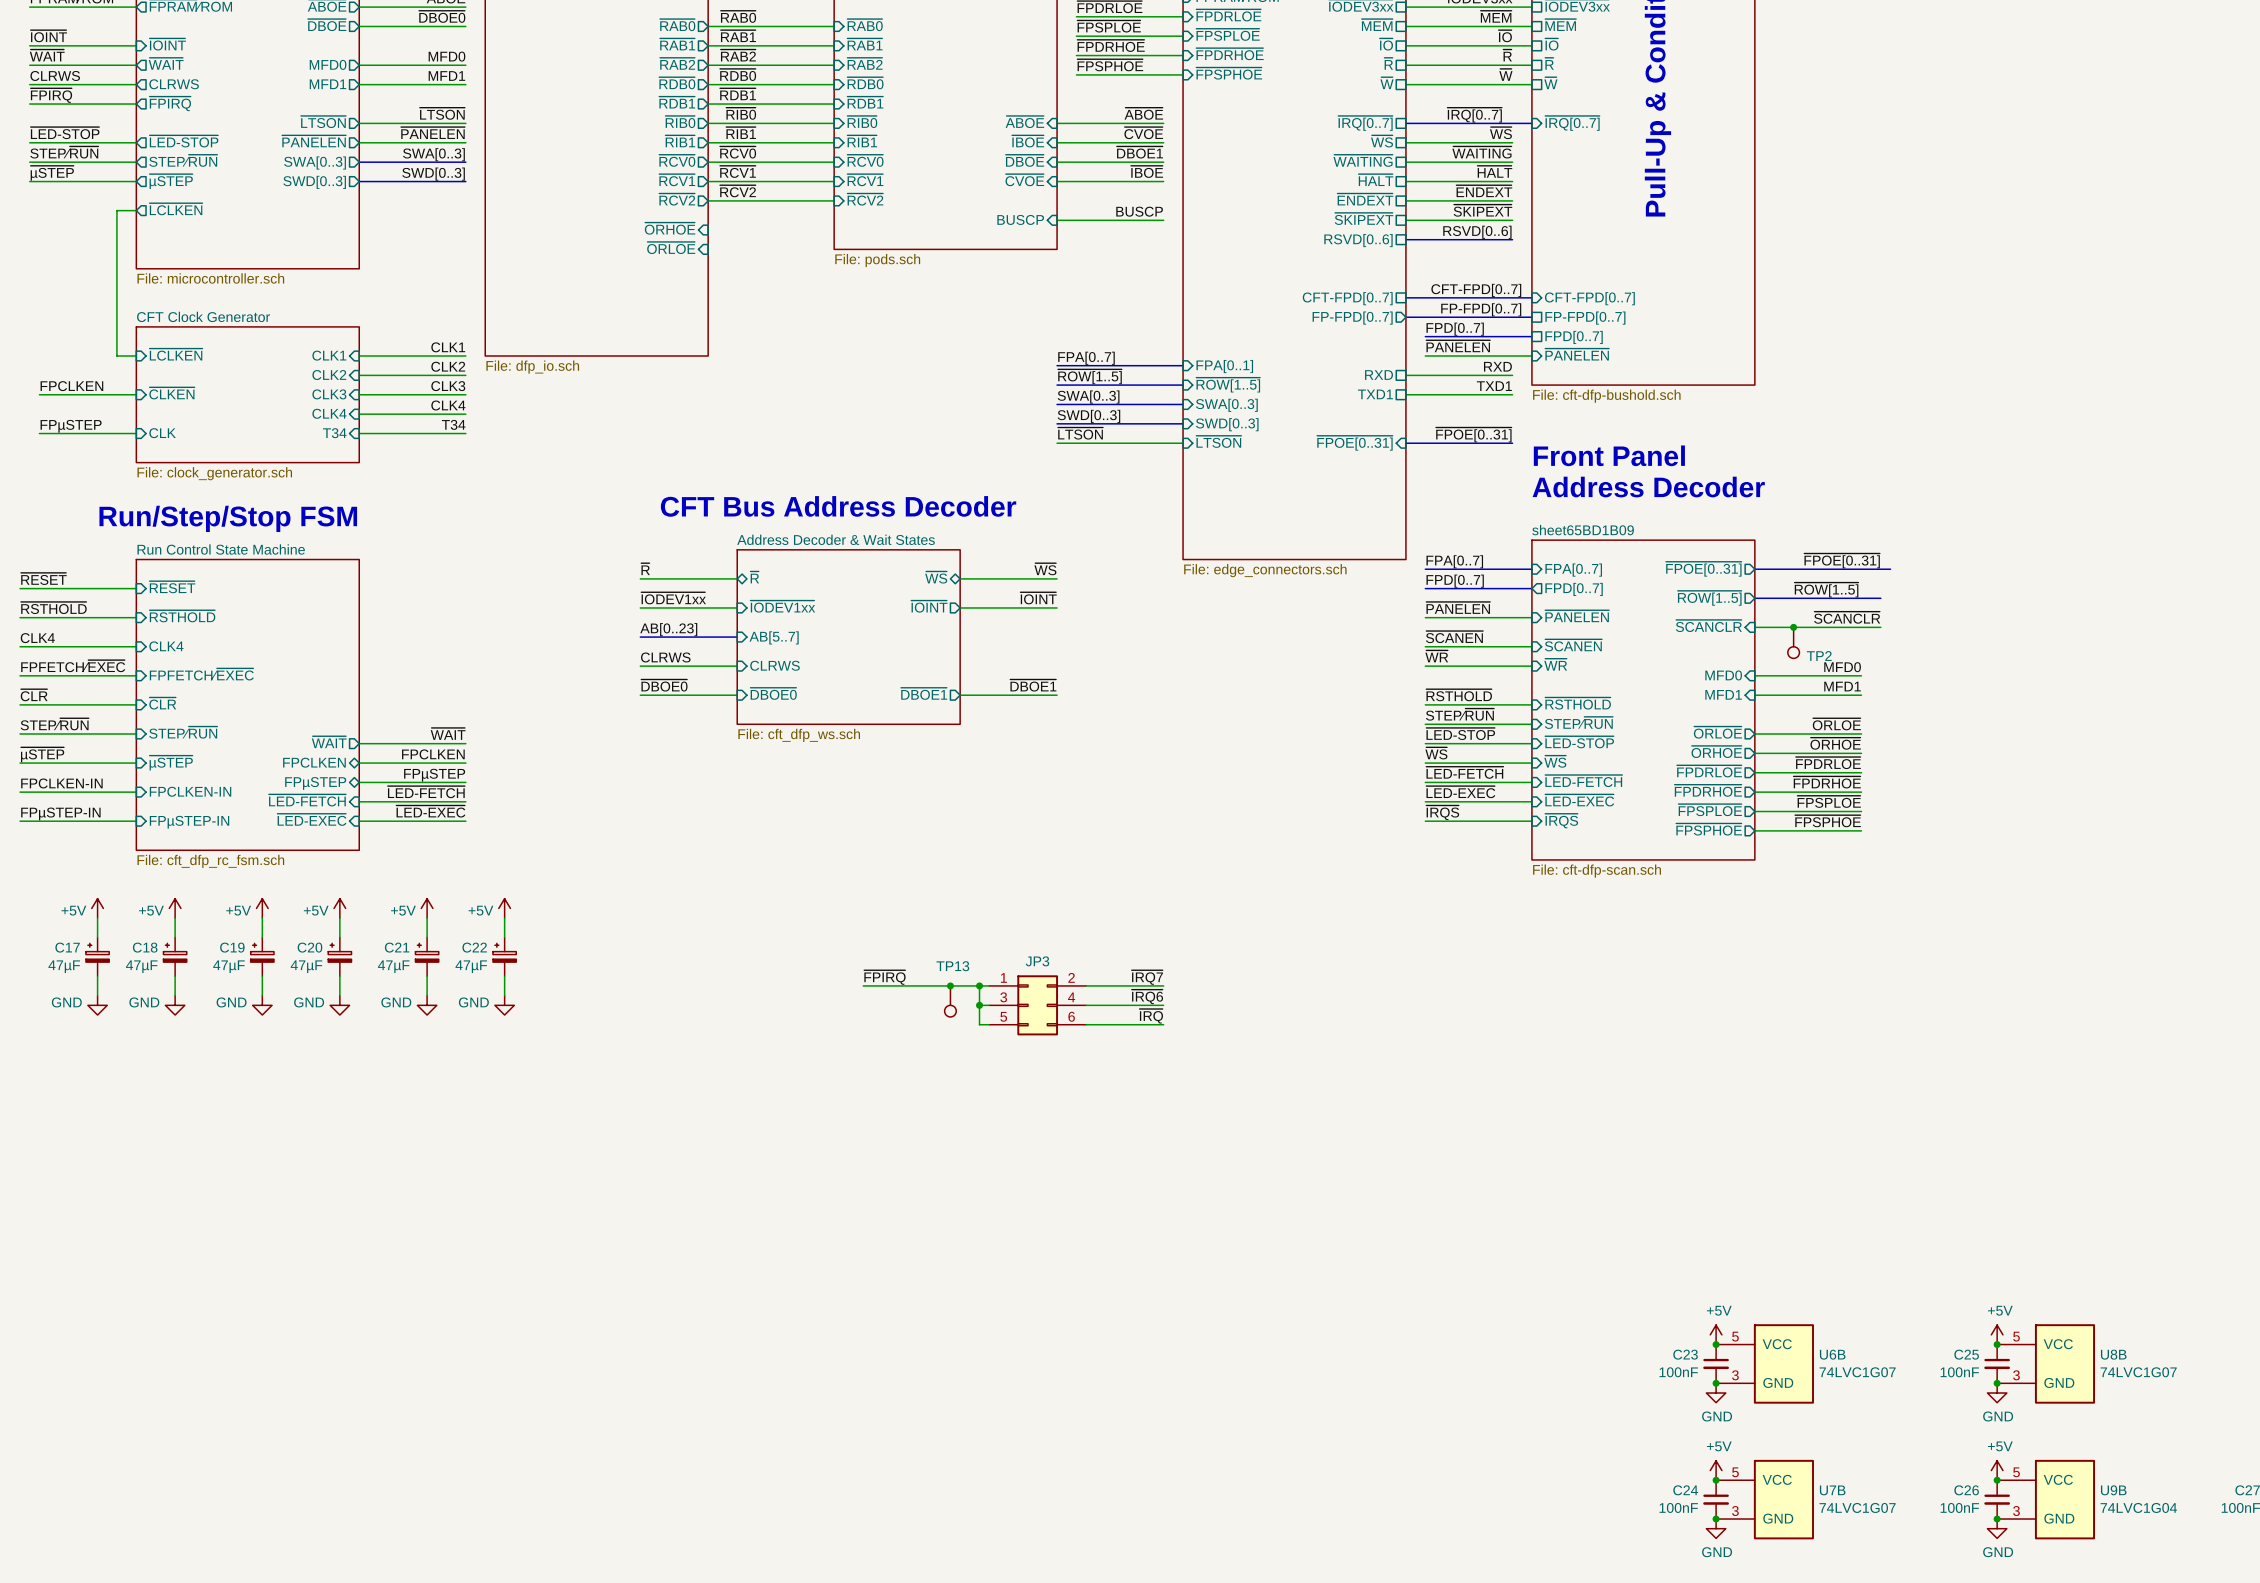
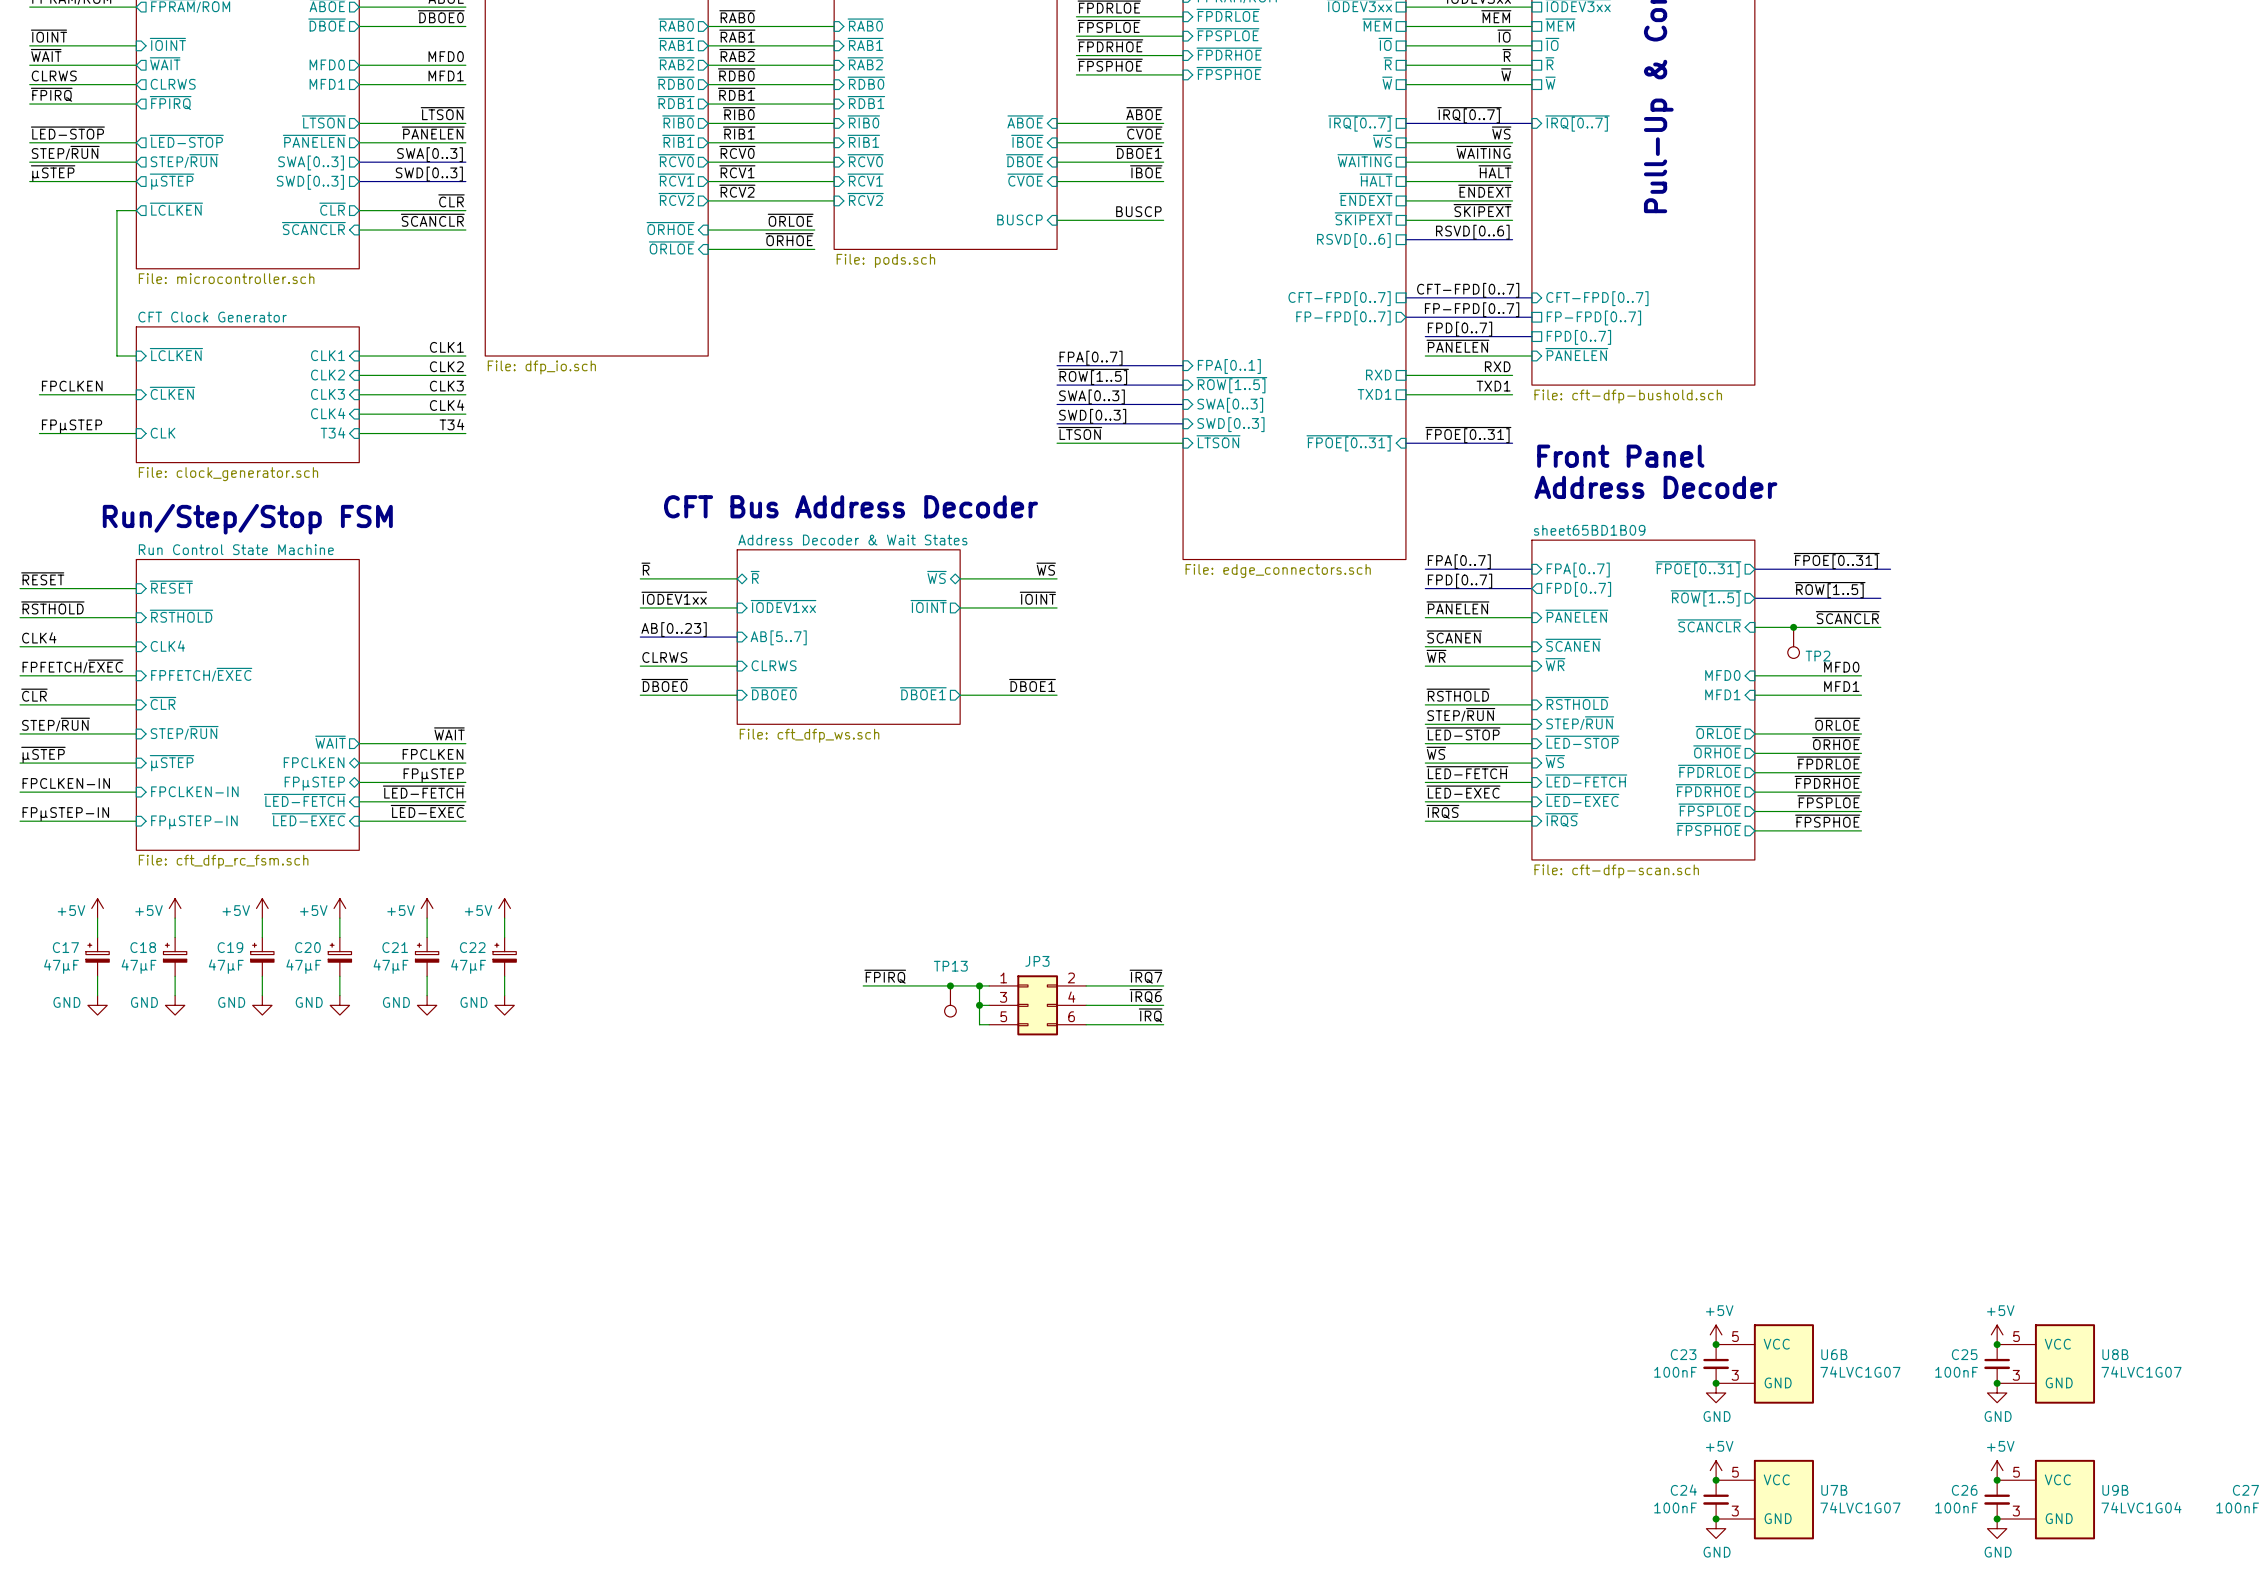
label: none -> ~{CLR} (451, 200)
sheet pin: none -> ~{CLR} (332, 209)
wire: none -> (359, 210) (465, 210)
label: none -> ~{SCANCLR} (432, 220)
label: none -> ~{ORLOE} (790, 220)
sheet pin: none -> ~{SCANCLR} (313, 228)
wire: none -> (359, 230) (465, 230)
wire: none -> (708, 230) (814, 230)
label: none -> ~{ORHOE} (789, 239)
wire: none -> (708, 249) (814, 249)

